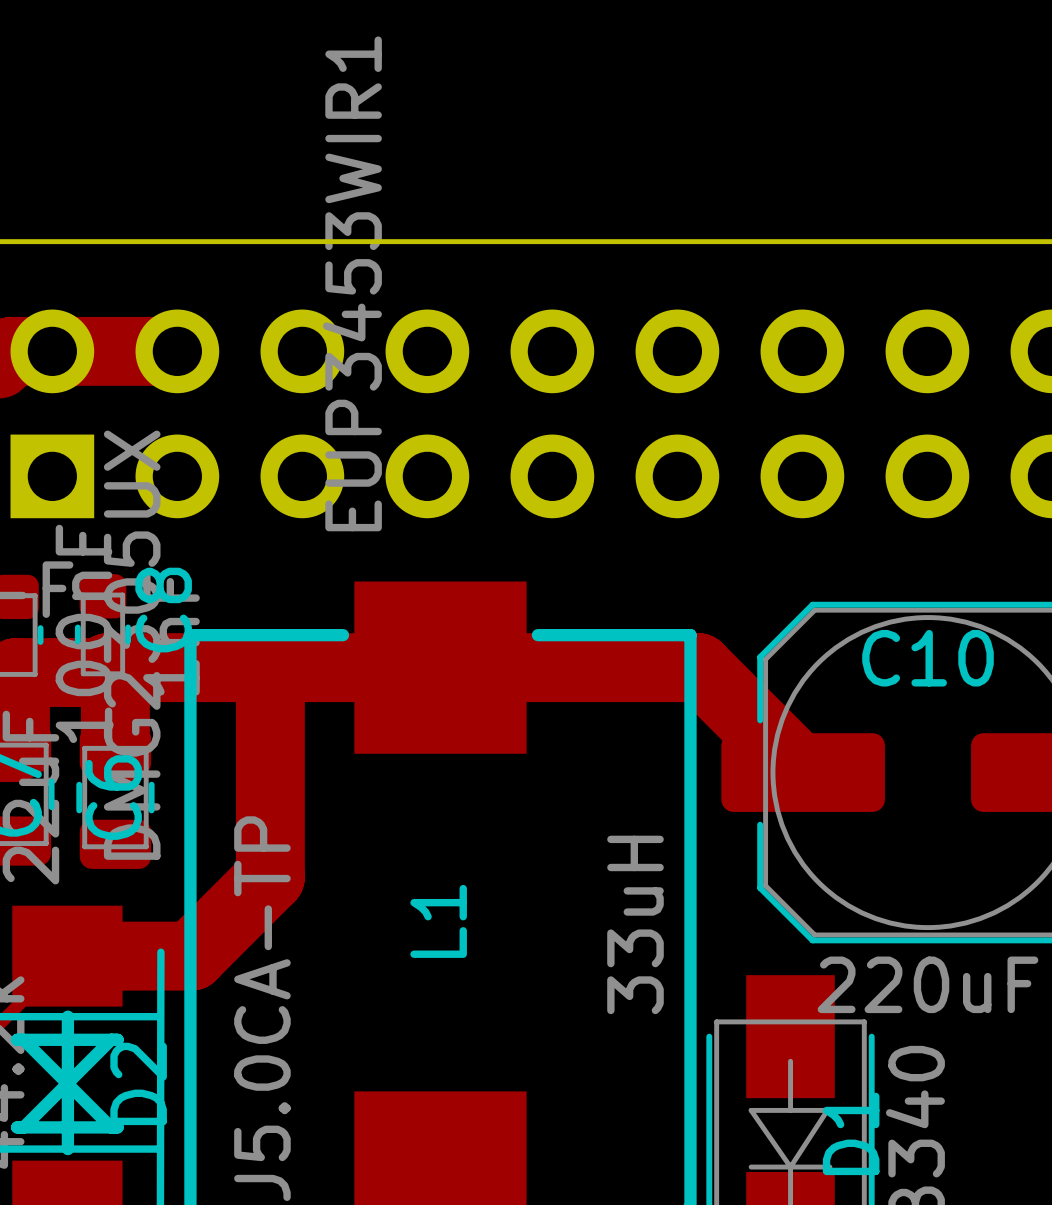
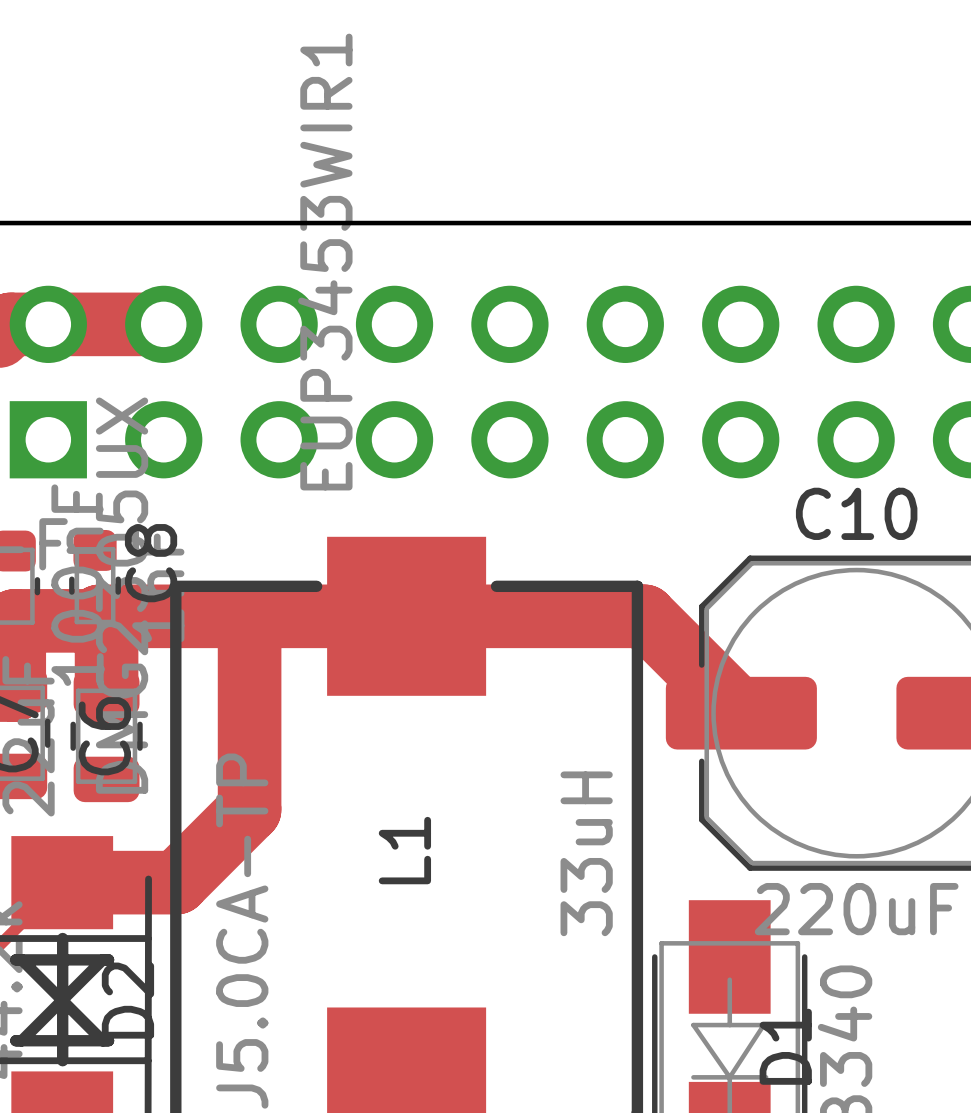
C10 name position: C10 (928, 658) -> C10 (856, 513)

